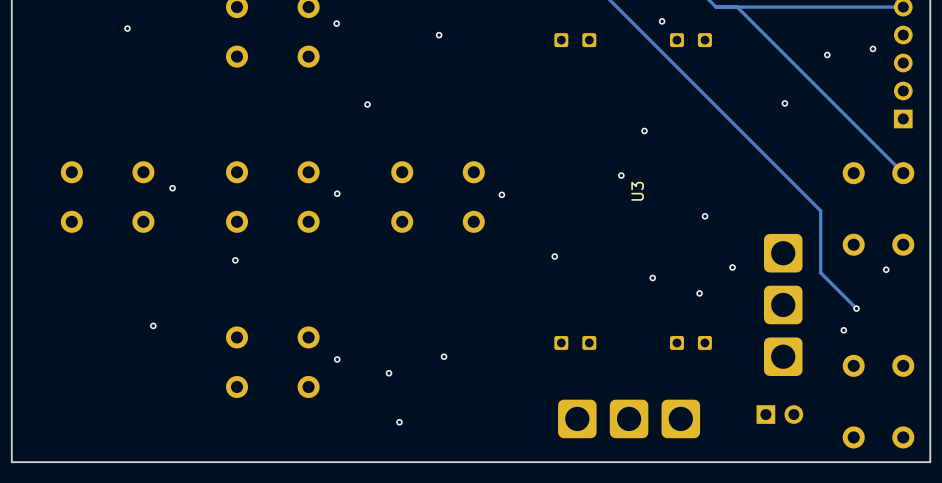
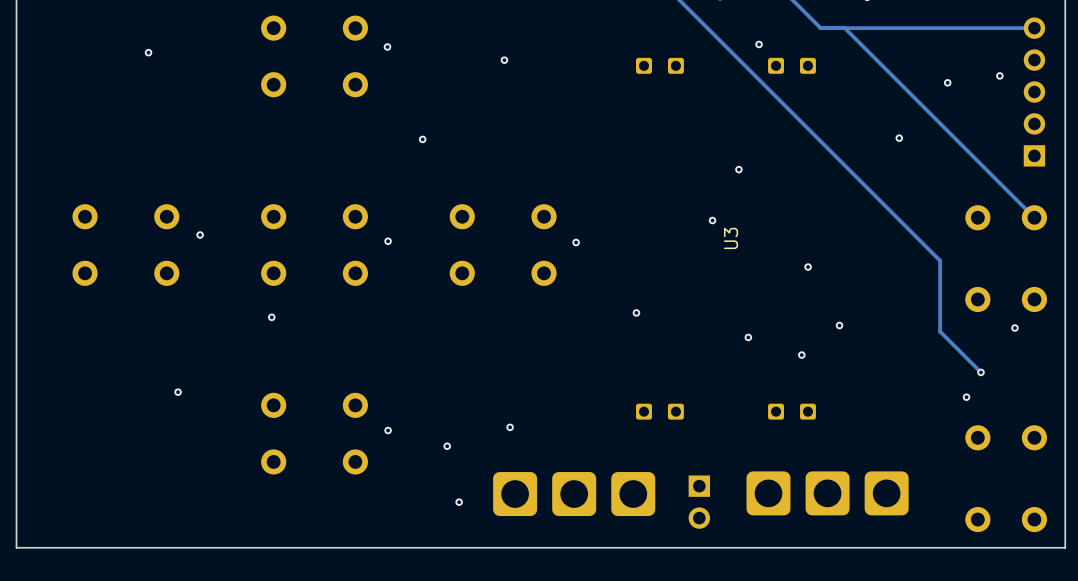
part: (783, 304) -> none
part: none -> (827, 493)
part rotation: 0° (779, 414) -> 90° clockwise (699, 502)
part position: (779, 414) -> (699, 502)
part: none -> (574, 494)
part: (629, 418) -> none

